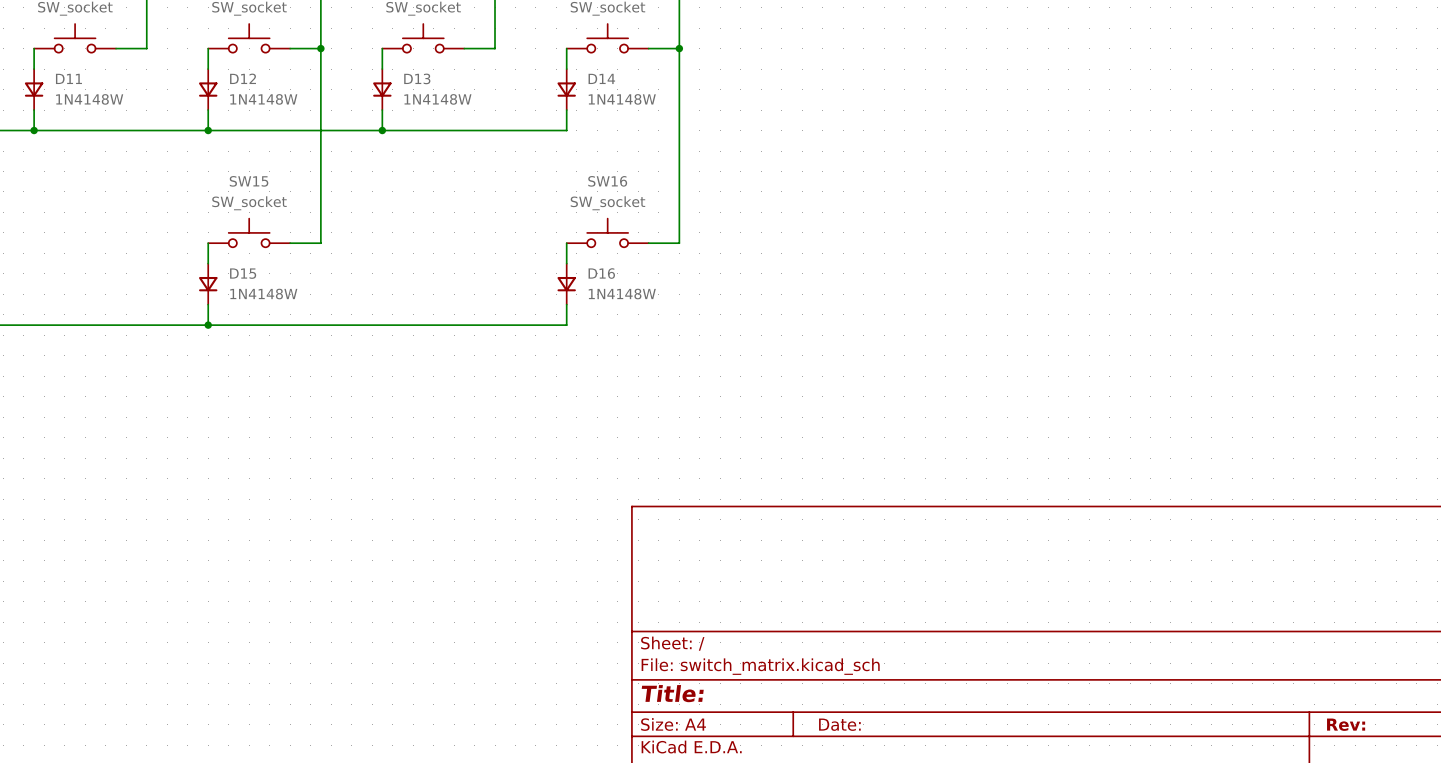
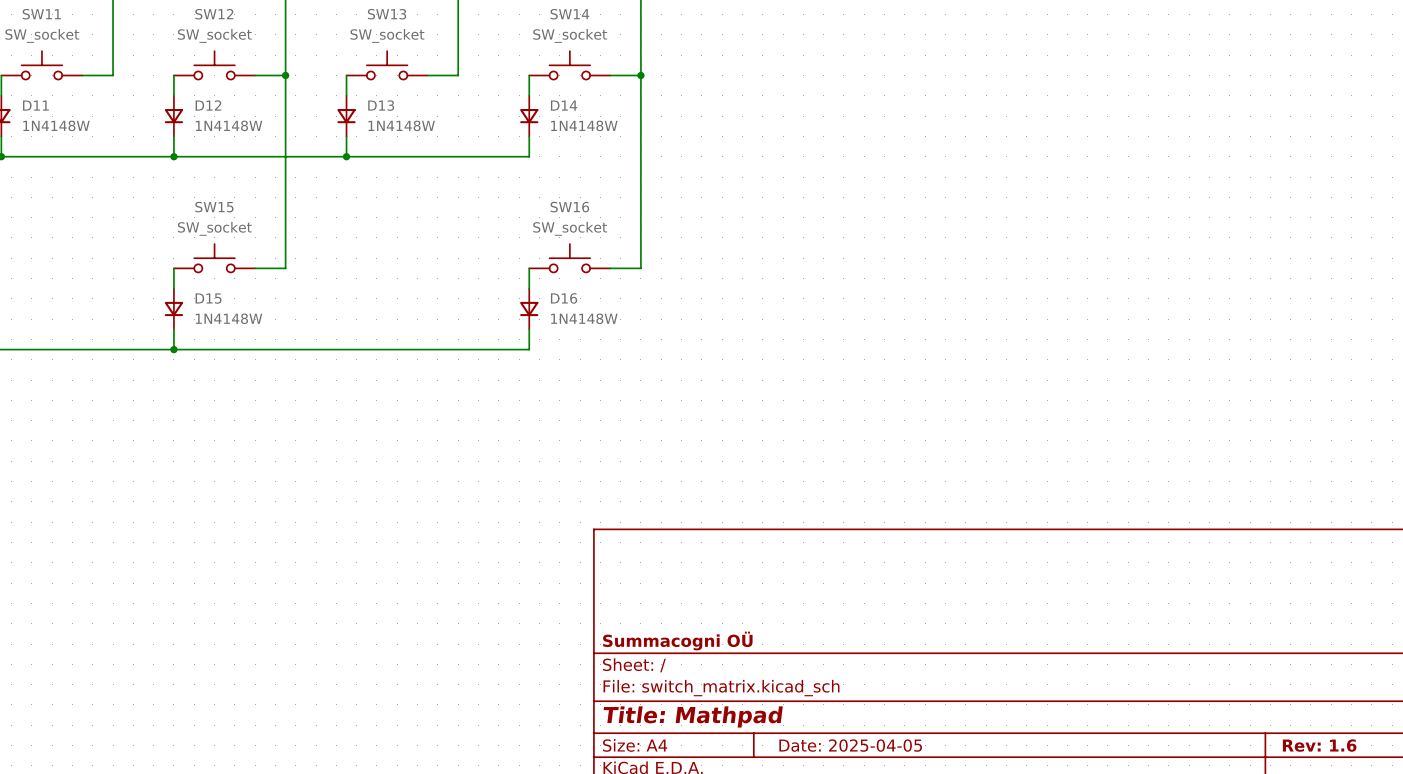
title block: none -> Summacogni OÜ (677, 640)
title block: Title: (672, 693) -> Title: Mathpad (693, 716)
title block: Date: (839, 724) -> Date: 2025-04-05 (850, 745)
title block: Rev: (1346, 724) -> Rev: 1.6 (1319, 745)

